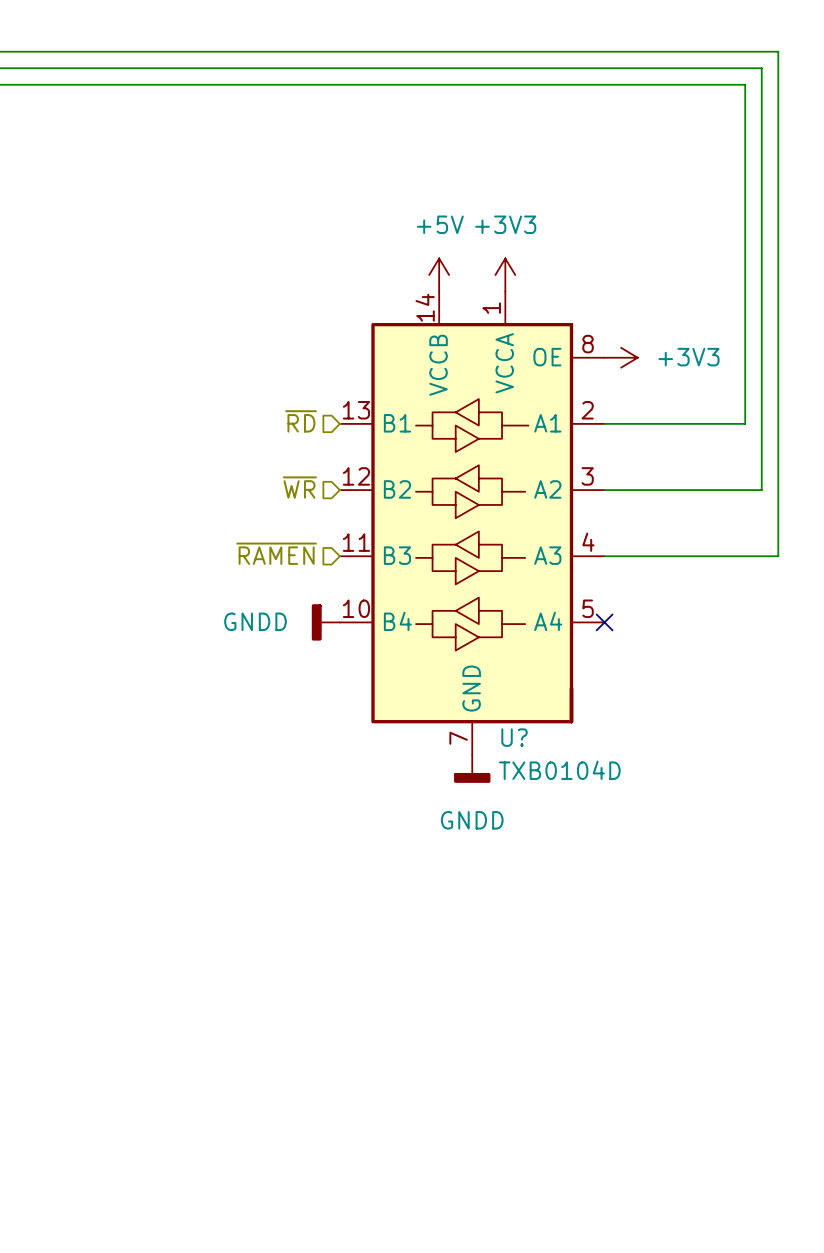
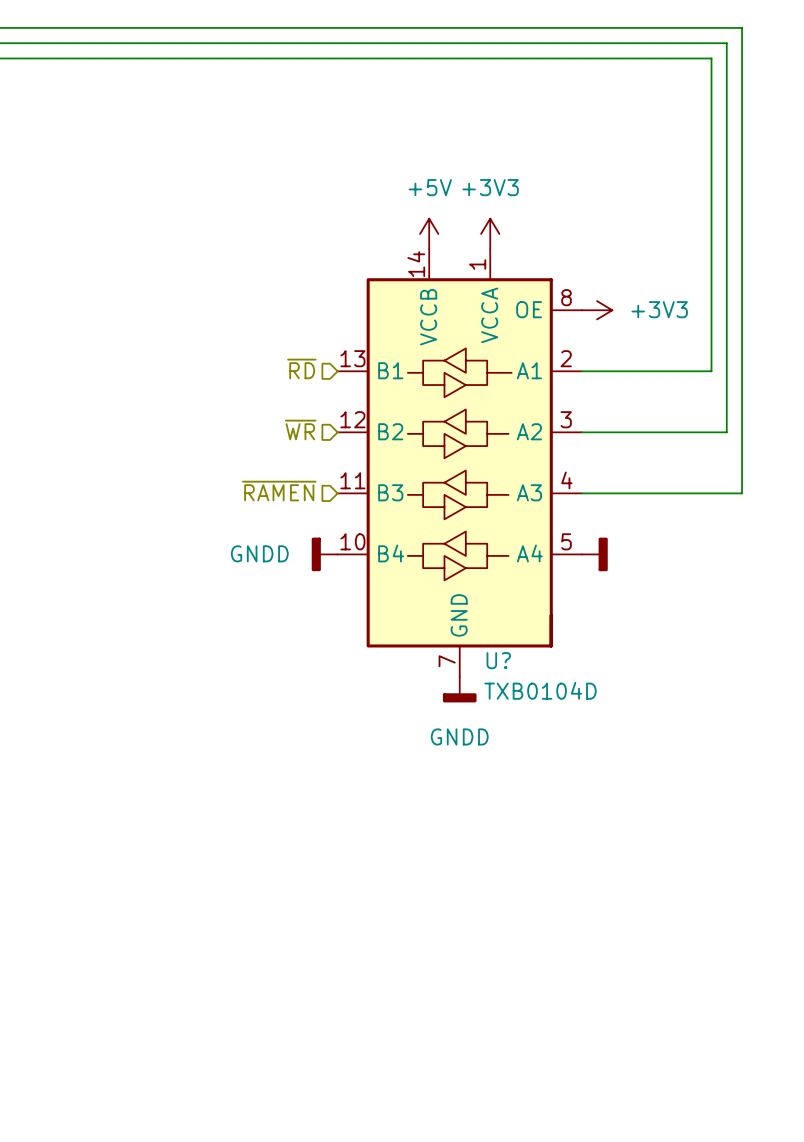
no-connect mark: (604, 622) -> none
power symbol: none -> (594, 554)

